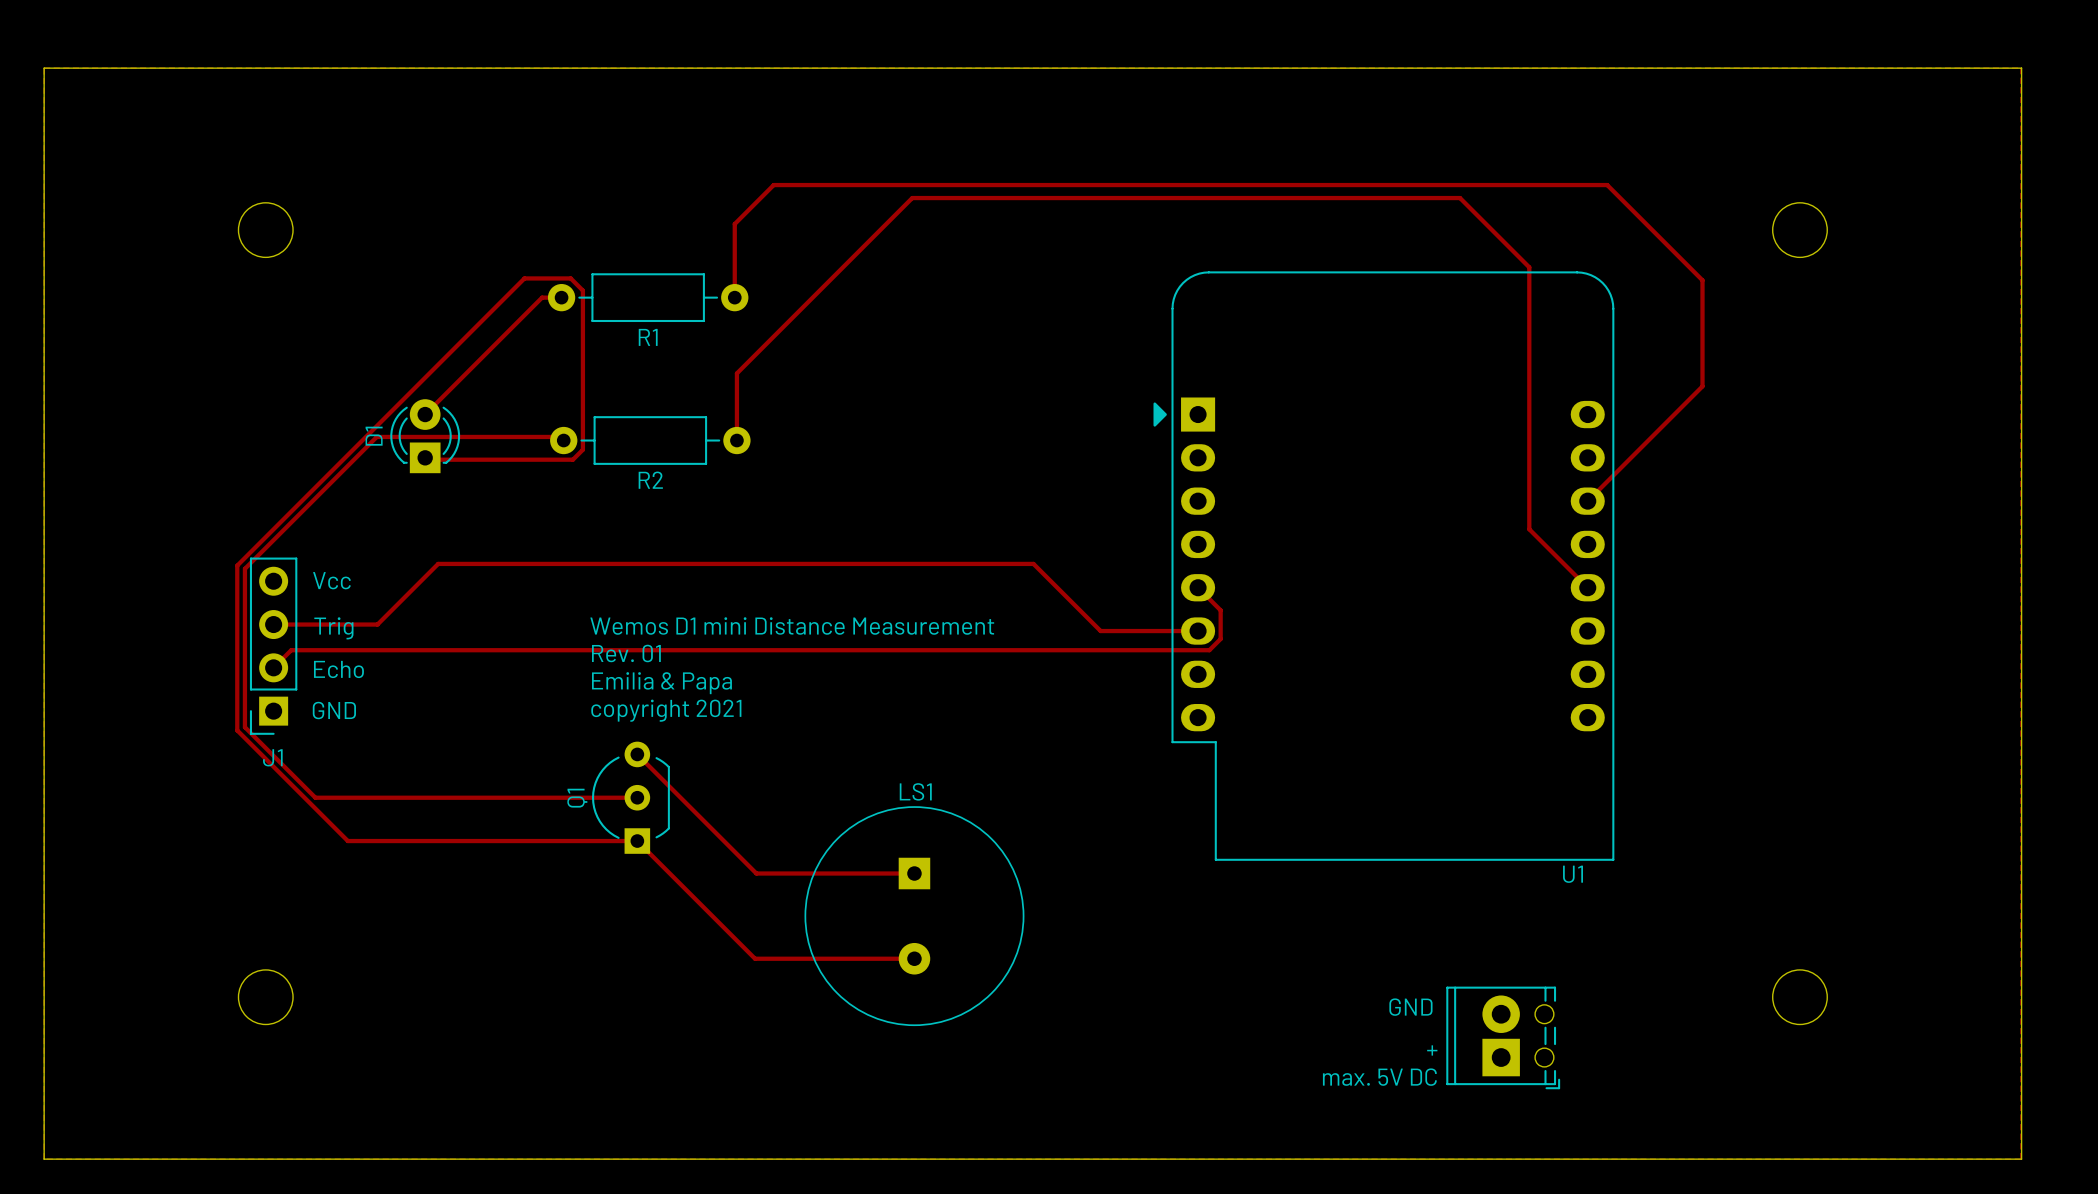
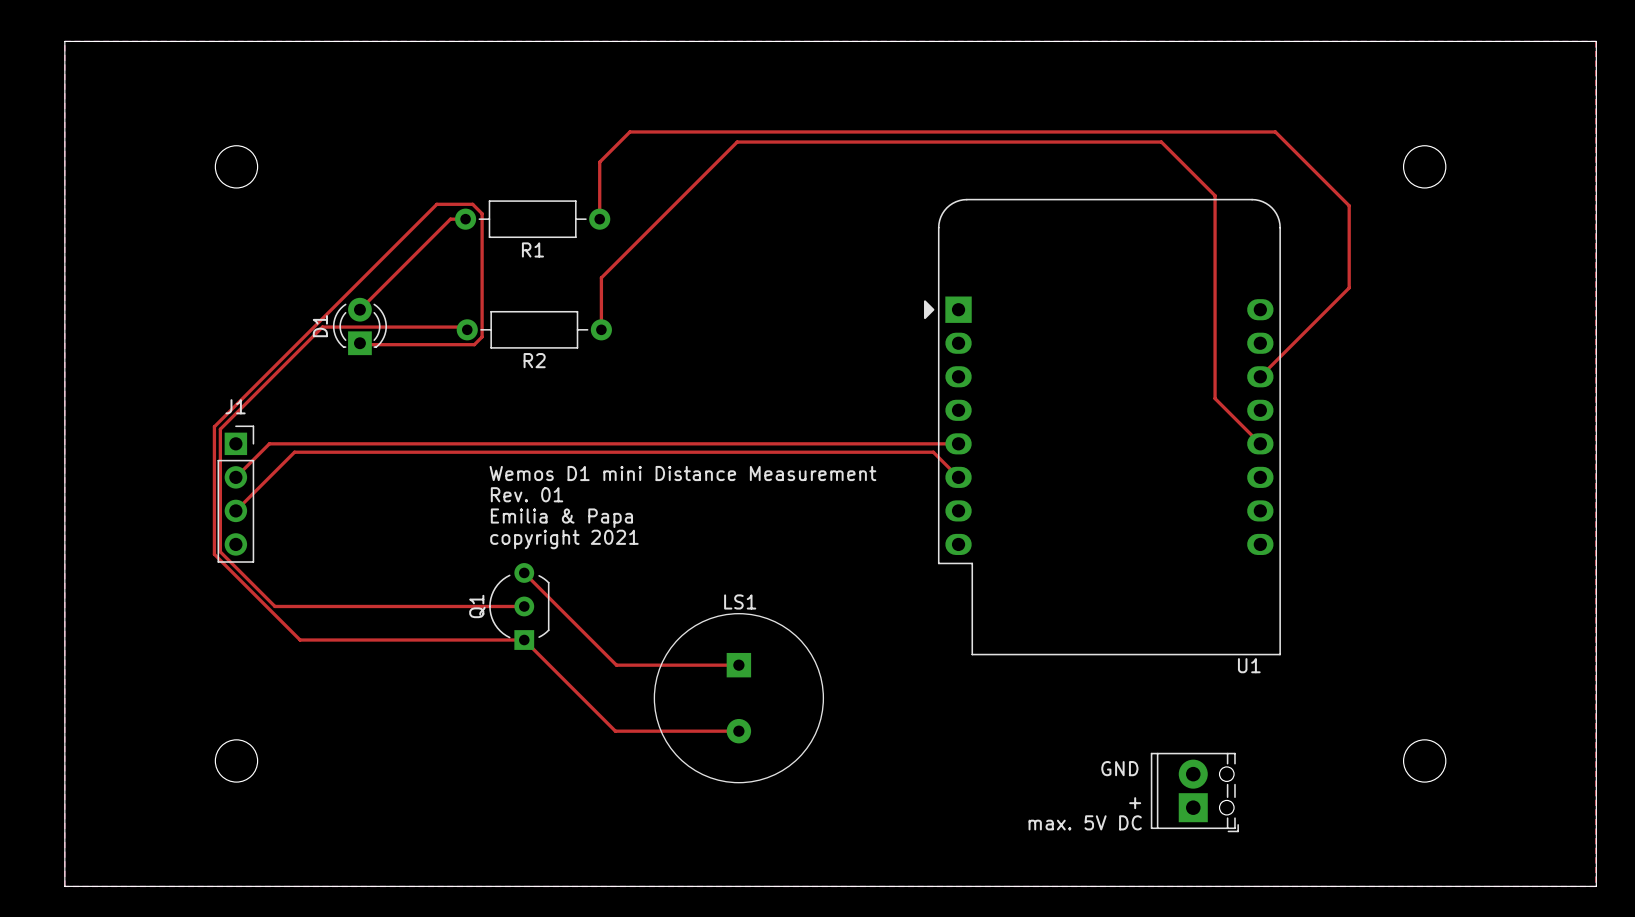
text: Vcc (331, 580) -> none
top track: (1198, 587) (1220, 610) (1220, 638) (1209, 650) (291, 650) (273, 667) -> (958, 443) (269, 443) (235, 477)
top track: (273, 624) (377, 624) (438, 563) (1033, 563) (1100, 631) (1198, 631) -> (235, 510) (294, 452) (933, 452) (958, 477)
text: Trig (333, 628) -> none
J1 rotation: 0° (273, 646) -> 180° (235, 494)
text: Echo (338, 669) -> none
text: GND (334, 710) -> none

